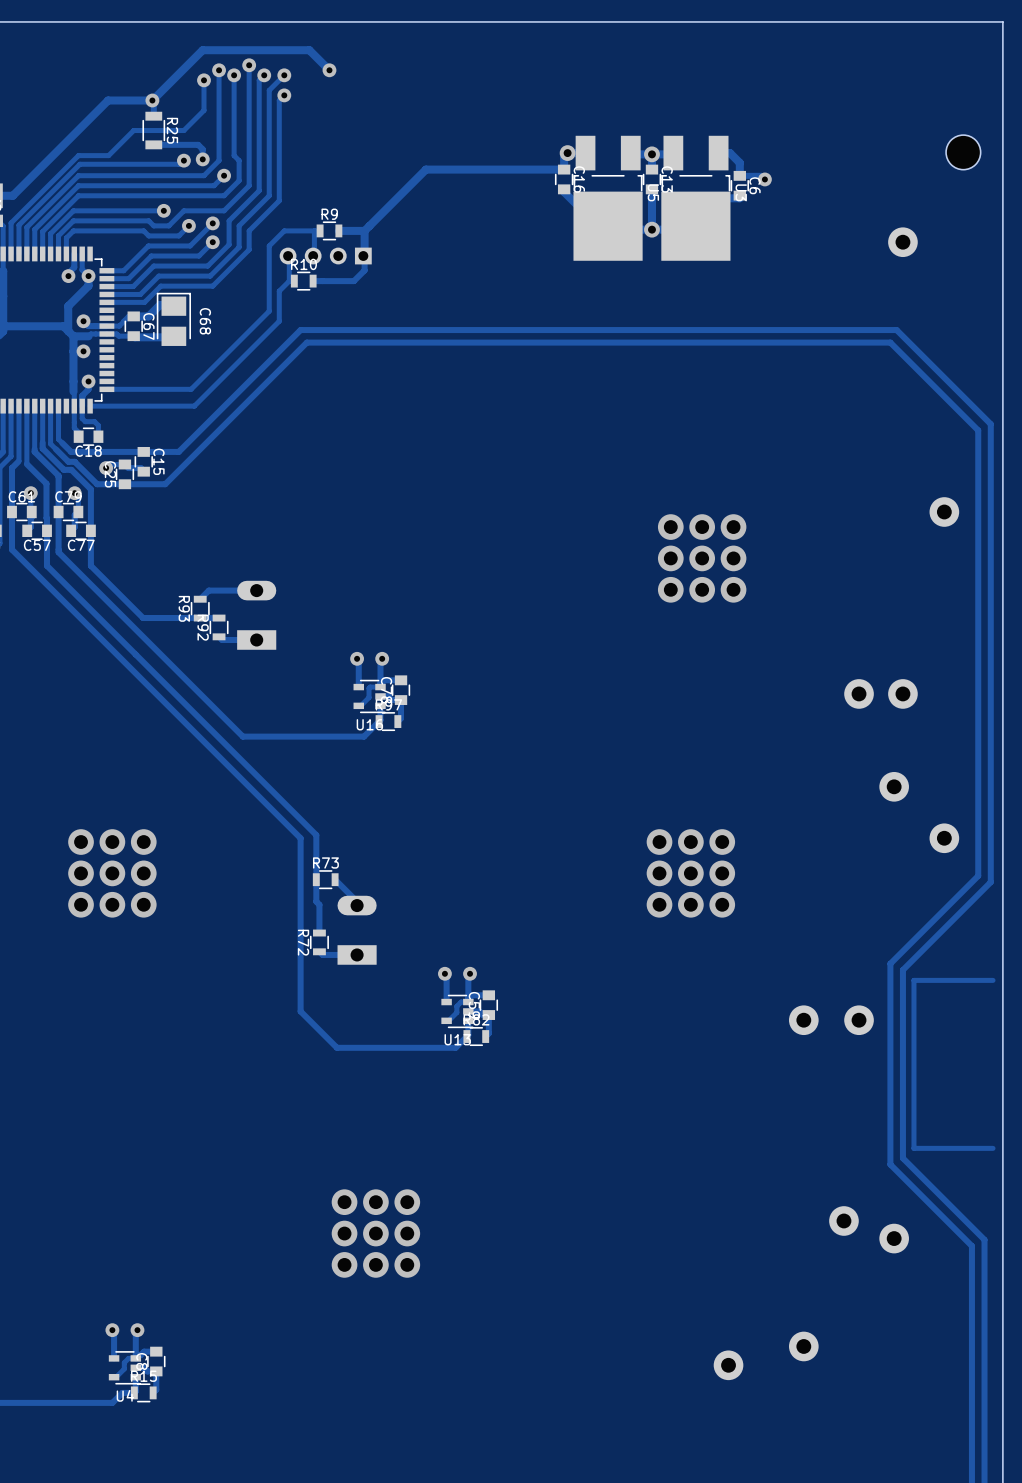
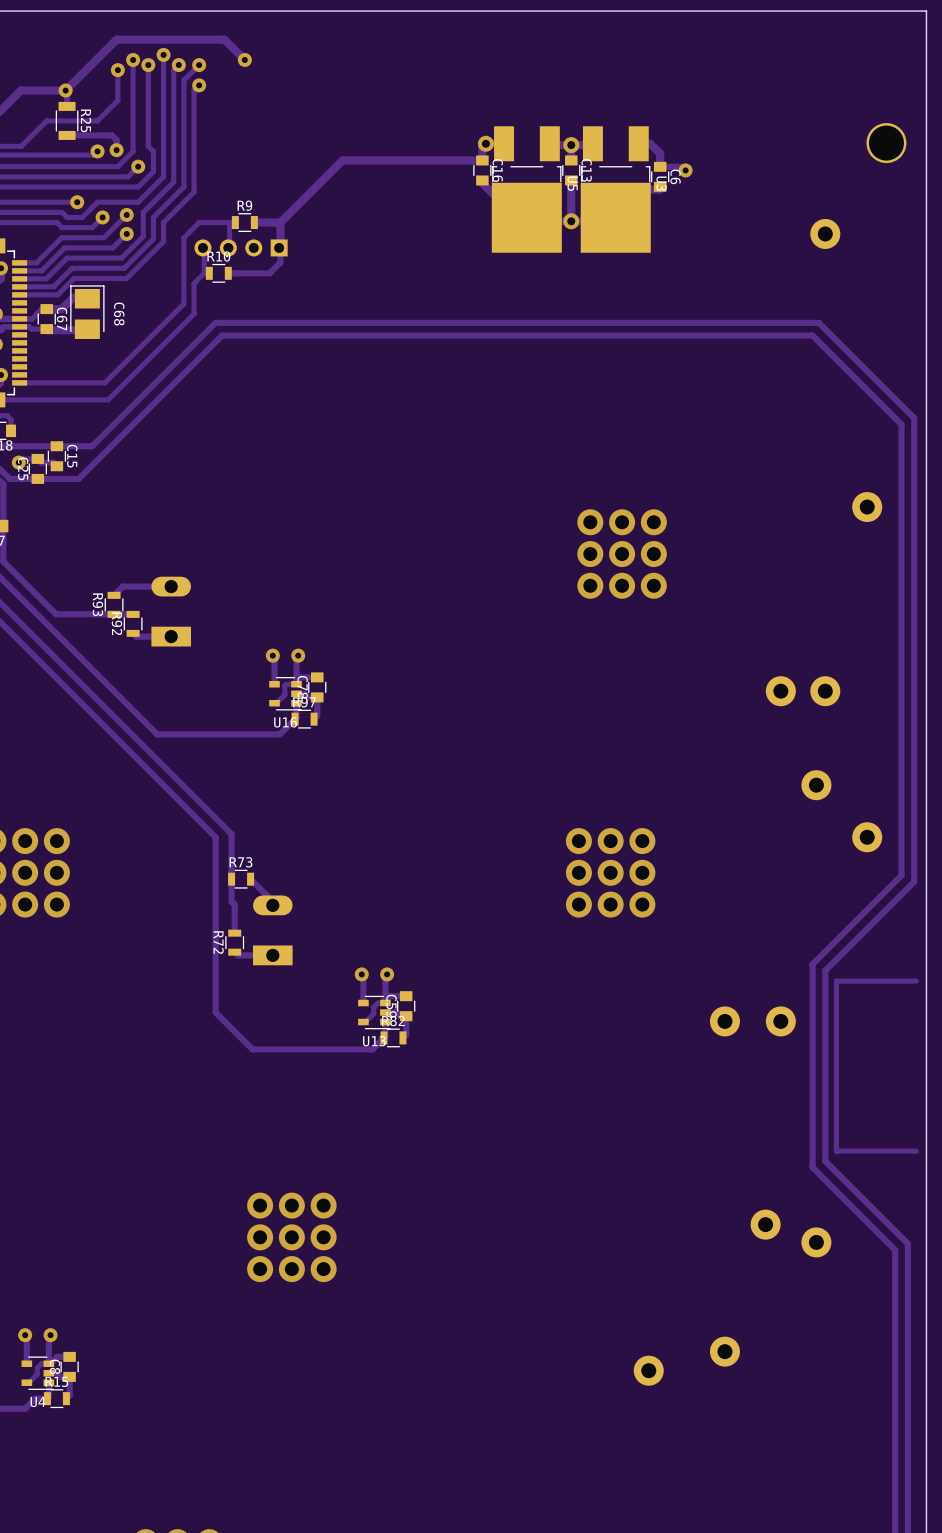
part footprint: [946, 135, 981, 170] -> [866, 123, 907, 164]

